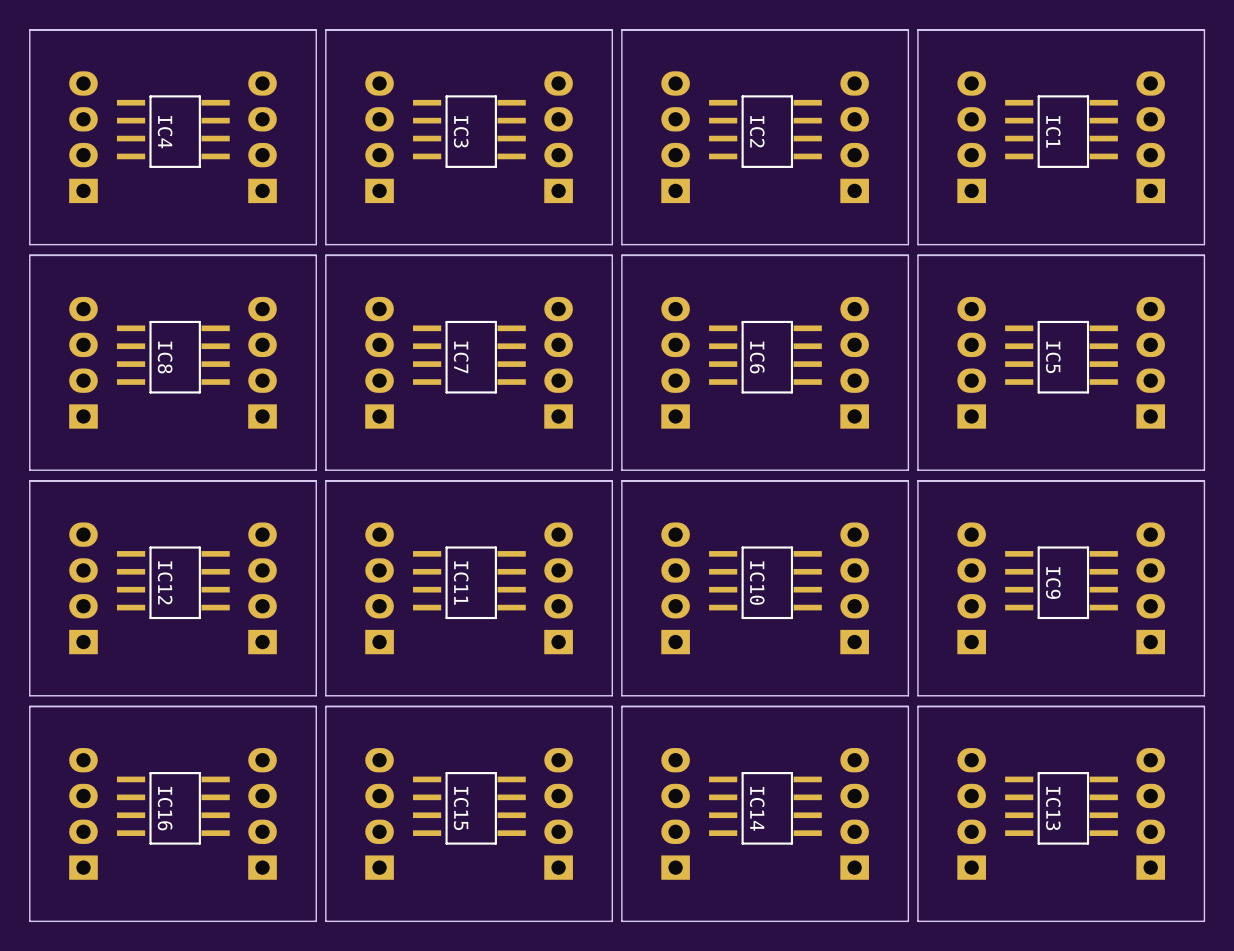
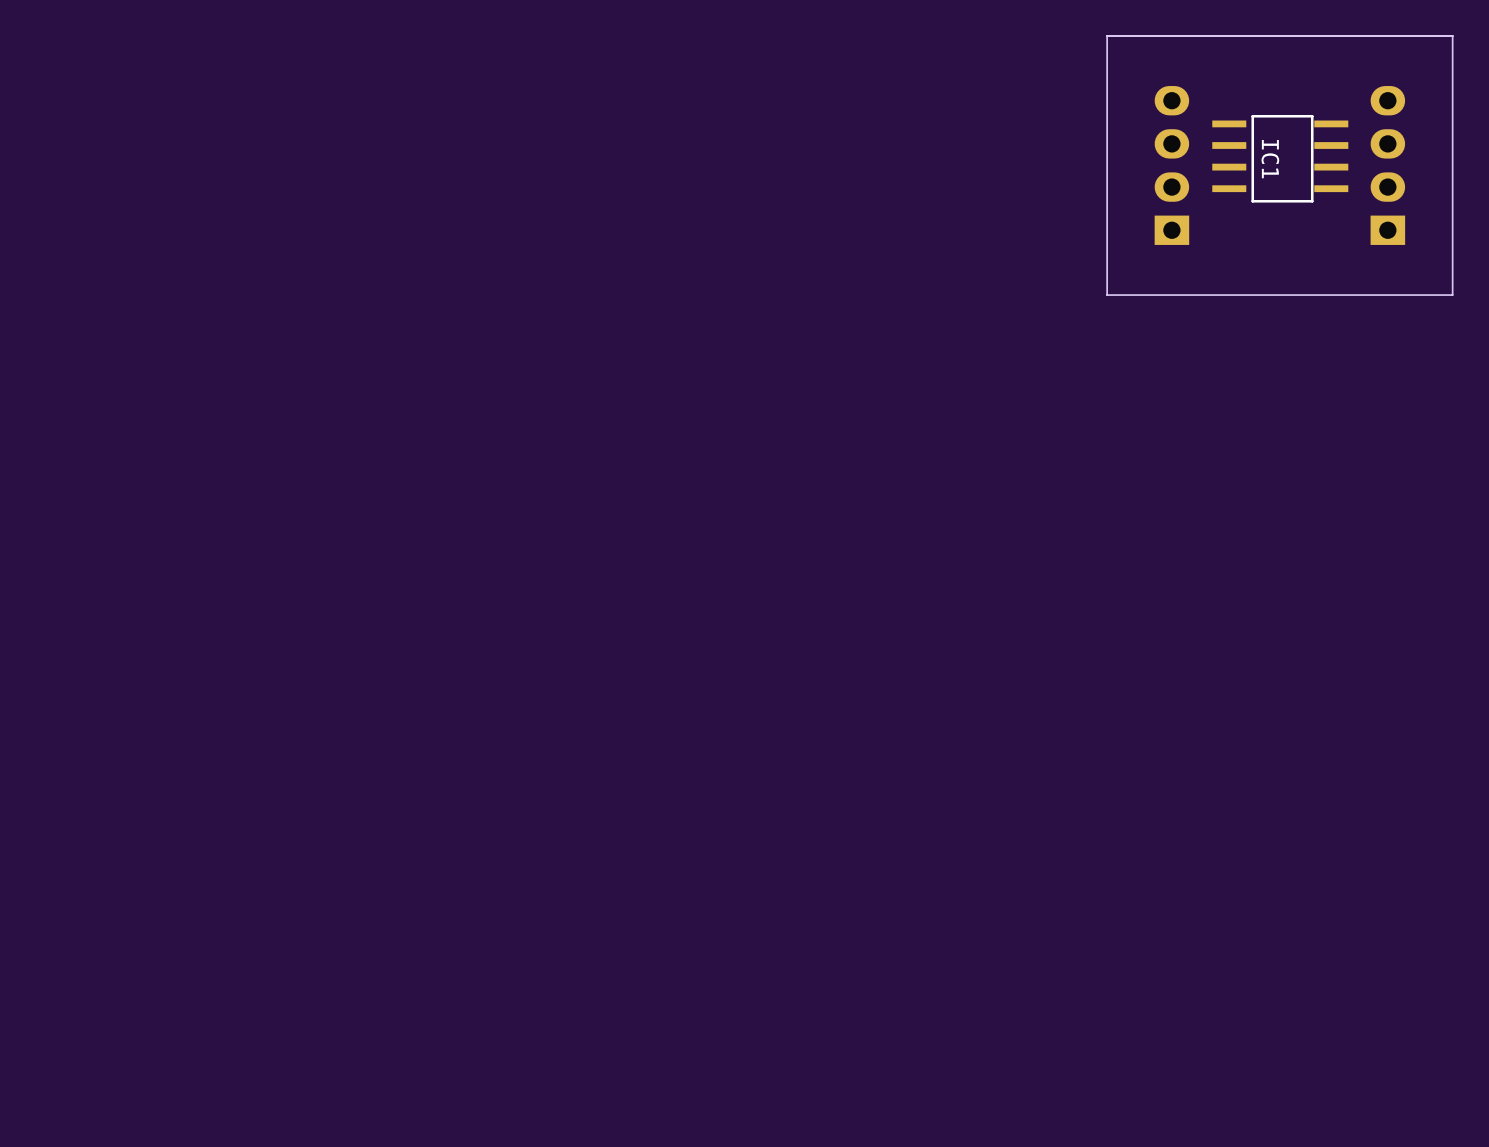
board edge: (316, 29) (29, 29) (29, 244) (316, 244) (316, 29) -> none
board edge: (612, 29) (325, 29) (325, 244) (612, 244) (612, 29) -> none
board edge: (908, 29) (621, 29) (621, 244) (908, 244) (908, 29) -> none
IC4: (173, 131) -> none
IC3: (469, 131) -> none
IC2: (765, 131) -> none
part: (83, 137) -> none
part: (262, 137) -> none
part: (379, 137) -> none
part: (558, 137) -> none
part: (675, 137) -> none
part: (854, 137) -> none
board edge: (316, 255) (29, 255) (29, 470) (316, 470) (316, 255) -> none
board edge: (612, 255) (325, 255) (325, 470) (612, 470) (612, 255) -> none
board edge: (908, 255) (621, 255) (621, 470) (908, 470) (908, 255) -> none
board edge: (1204, 255) (917, 255) (917, 470) (1204, 470) (1204, 255) -> none
IC8: (173, 357) -> none
IC7: (469, 357) -> none
IC6: (765, 357) -> none
IC5: (1061, 357) -> none
part: (83, 362) -> none
part: (262, 362) -> none
part: (379, 362) -> none
part: (558, 362) -> none
part: (675, 362) -> none
part: (854, 362) -> none
part: (971, 362) -> none
part: (1150, 362) -> none
board edge: (316, 480) (29, 480) (29, 695) (316, 695) (316, 480) -> none
board edge: (612, 480) (325, 480) (325, 695) (612, 695) (612, 480) -> none
board edge: (908, 480) (621, 480) (621, 695) (908, 695) (908, 480) -> none
board edge: (1204, 480) (917, 480) (917, 695) (1204, 695) (1204, 480) -> none
IC12: (173, 582) -> none
IC11: (469, 582) -> none
IC10: (765, 582) -> none
IC9: (1061, 582) -> none
part: (83, 588) -> none
part: (262, 588) -> none
part: (379, 588) -> none
part: (558, 588) -> none
part: (675, 588) -> none
part: (854, 588) -> none
part: (971, 588) -> none
part: (1150, 588) -> none
board edge: (316, 706) (29, 706) (29, 921) (316, 921) (316, 706) -> none
board edge: (612, 706) (325, 706) (325, 921) (612, 921) (612, 706) -> none
board edge: (908, 706) (621, 706) (621, 921) (908, 921) (908, 706) -> none
board edge: (1204, 706) (917, 706) (917, 921) (1204, 921) (1204, 706) -> none
IC16: (173, 808) -> none
IC15: (469, 808) -> none
IC14: (765, 808) -> none
IC13: (1061, 808) -> none
part: (83, 813) -> none
part: (262, 813) -> none
part: (379, 813) -> none
part: (558, 813) -> none
part: (675, 813) -> none
part: (854, 813) -> none
part: (971, 813) -> none
part: (1150, 813) -> none

